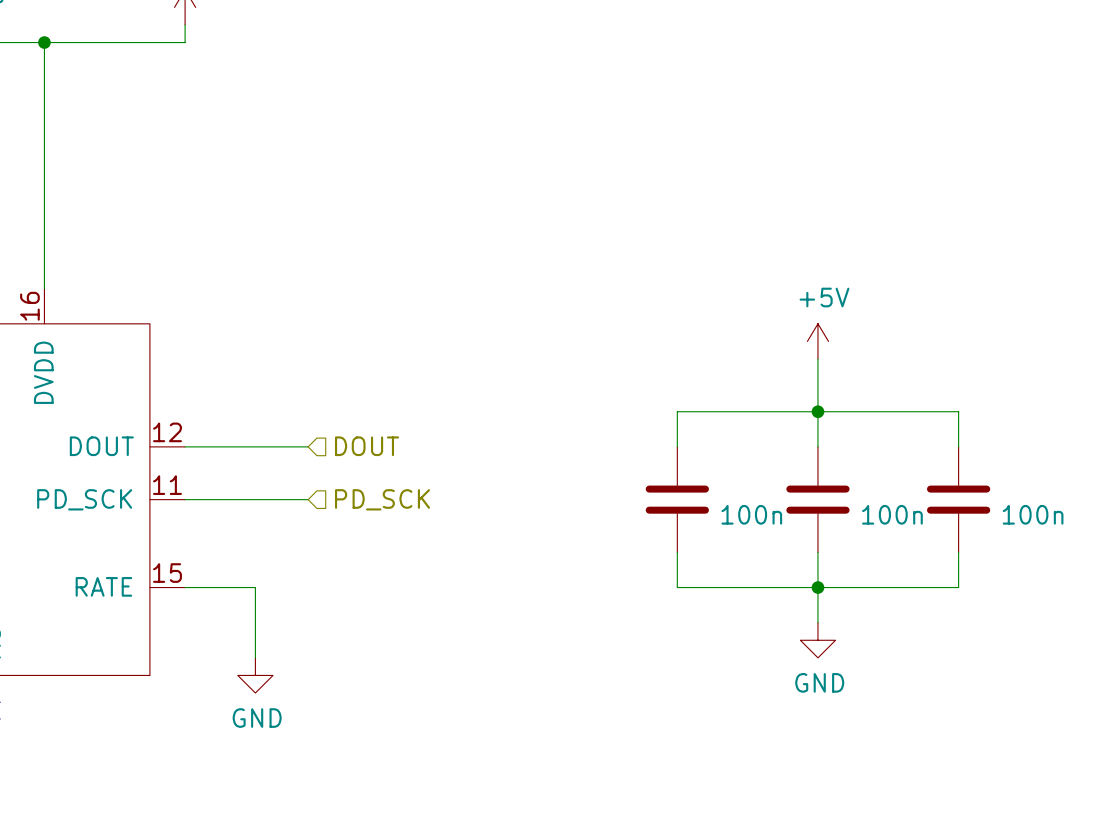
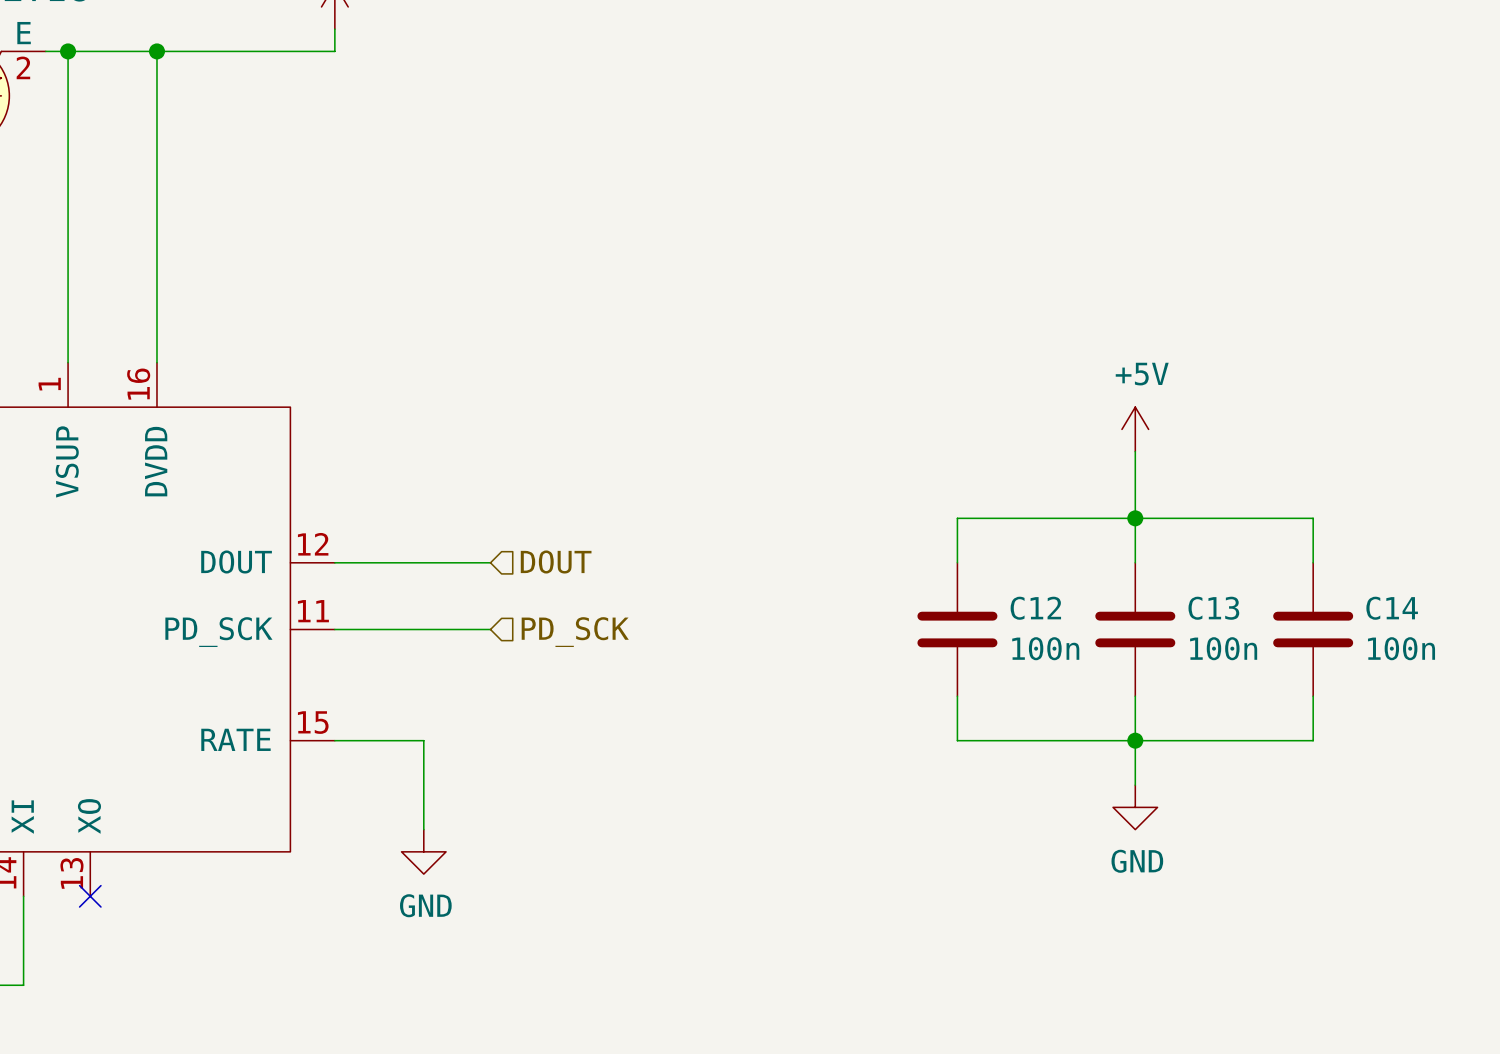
C12 name: none -> C12 (1035, 608)
C13 name: none -> C13 (1213, 608)
C14 name: none -> C14 (1392, 608)

